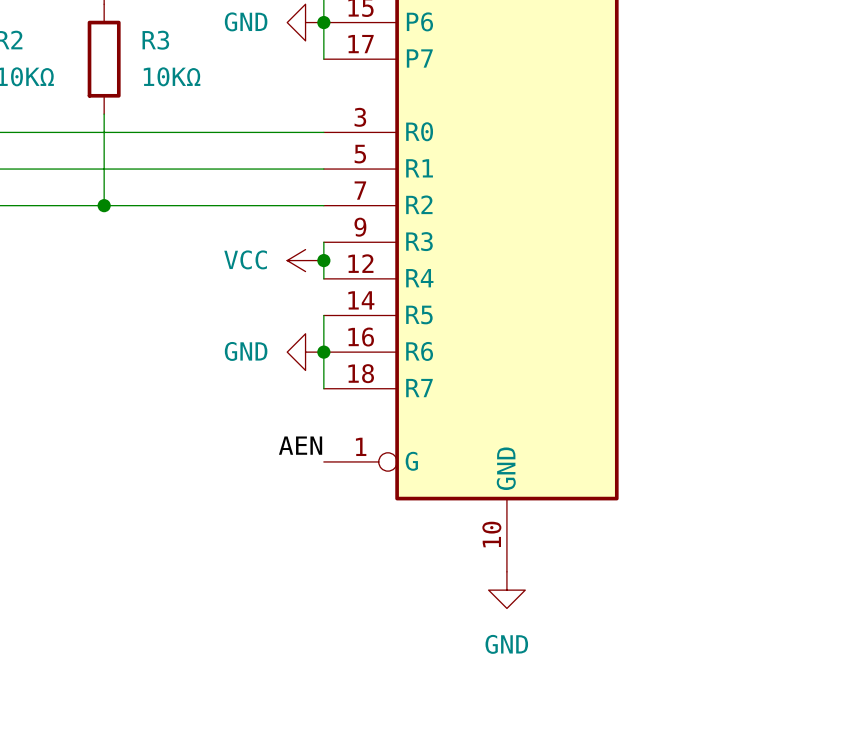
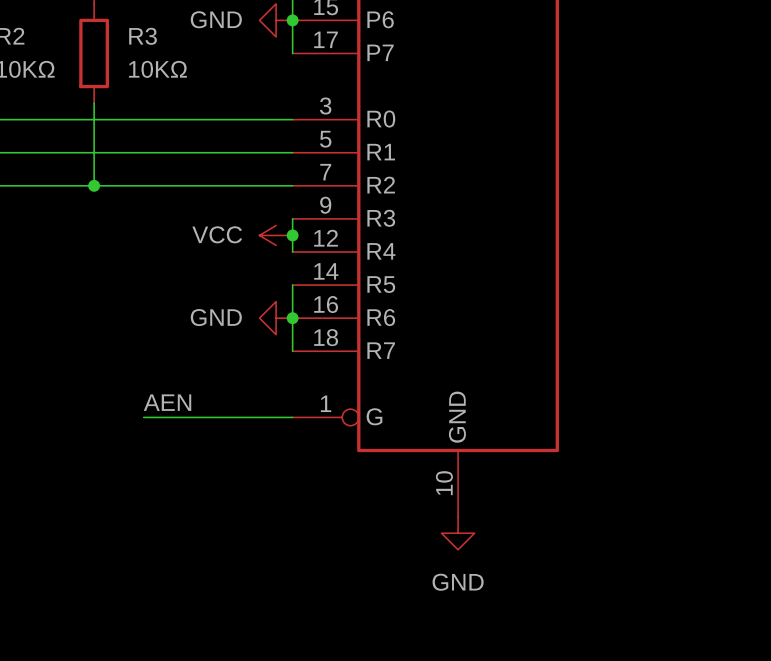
label position: AEN (300, 445) -> AEN (167, 402)
wire: none -> (143, 417) (292, 417)

